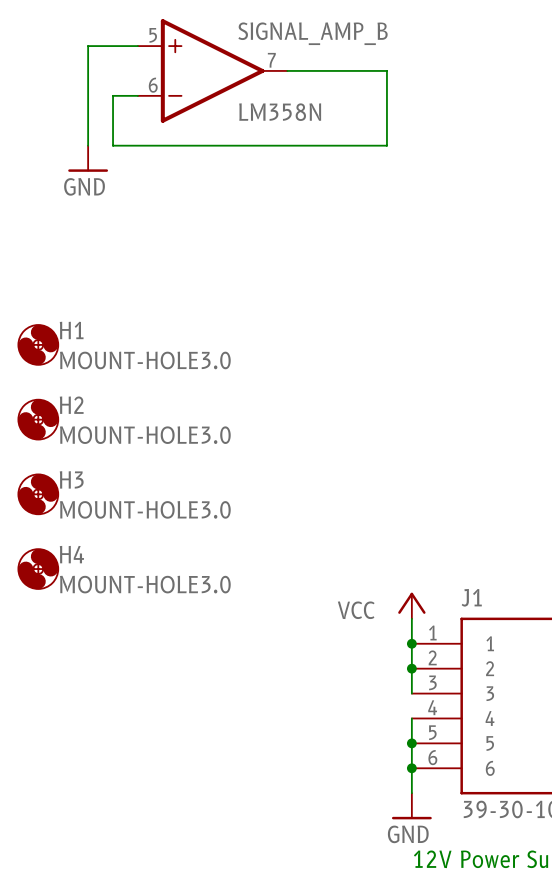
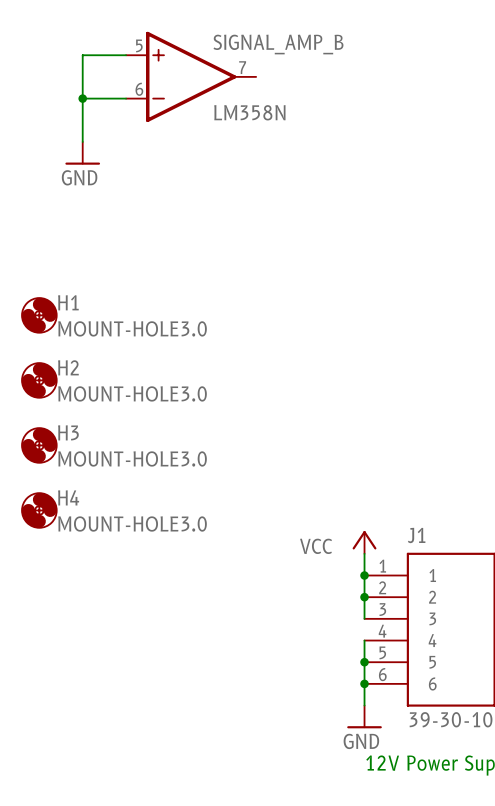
wire: (287, 70) (386, 70) (386, 145) (113, 145) (113, 95) -> (82, 98) (104, 98)
junction: none -> (82, 98)

